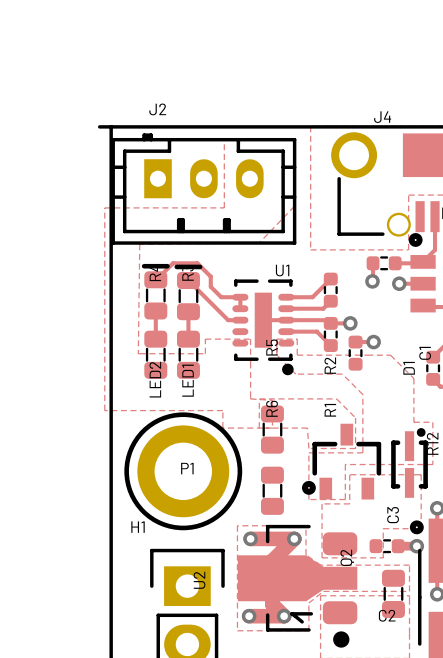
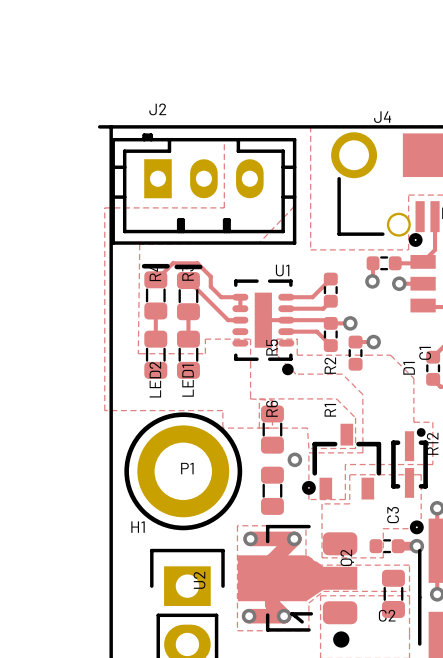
via: none -> (294, 459)

